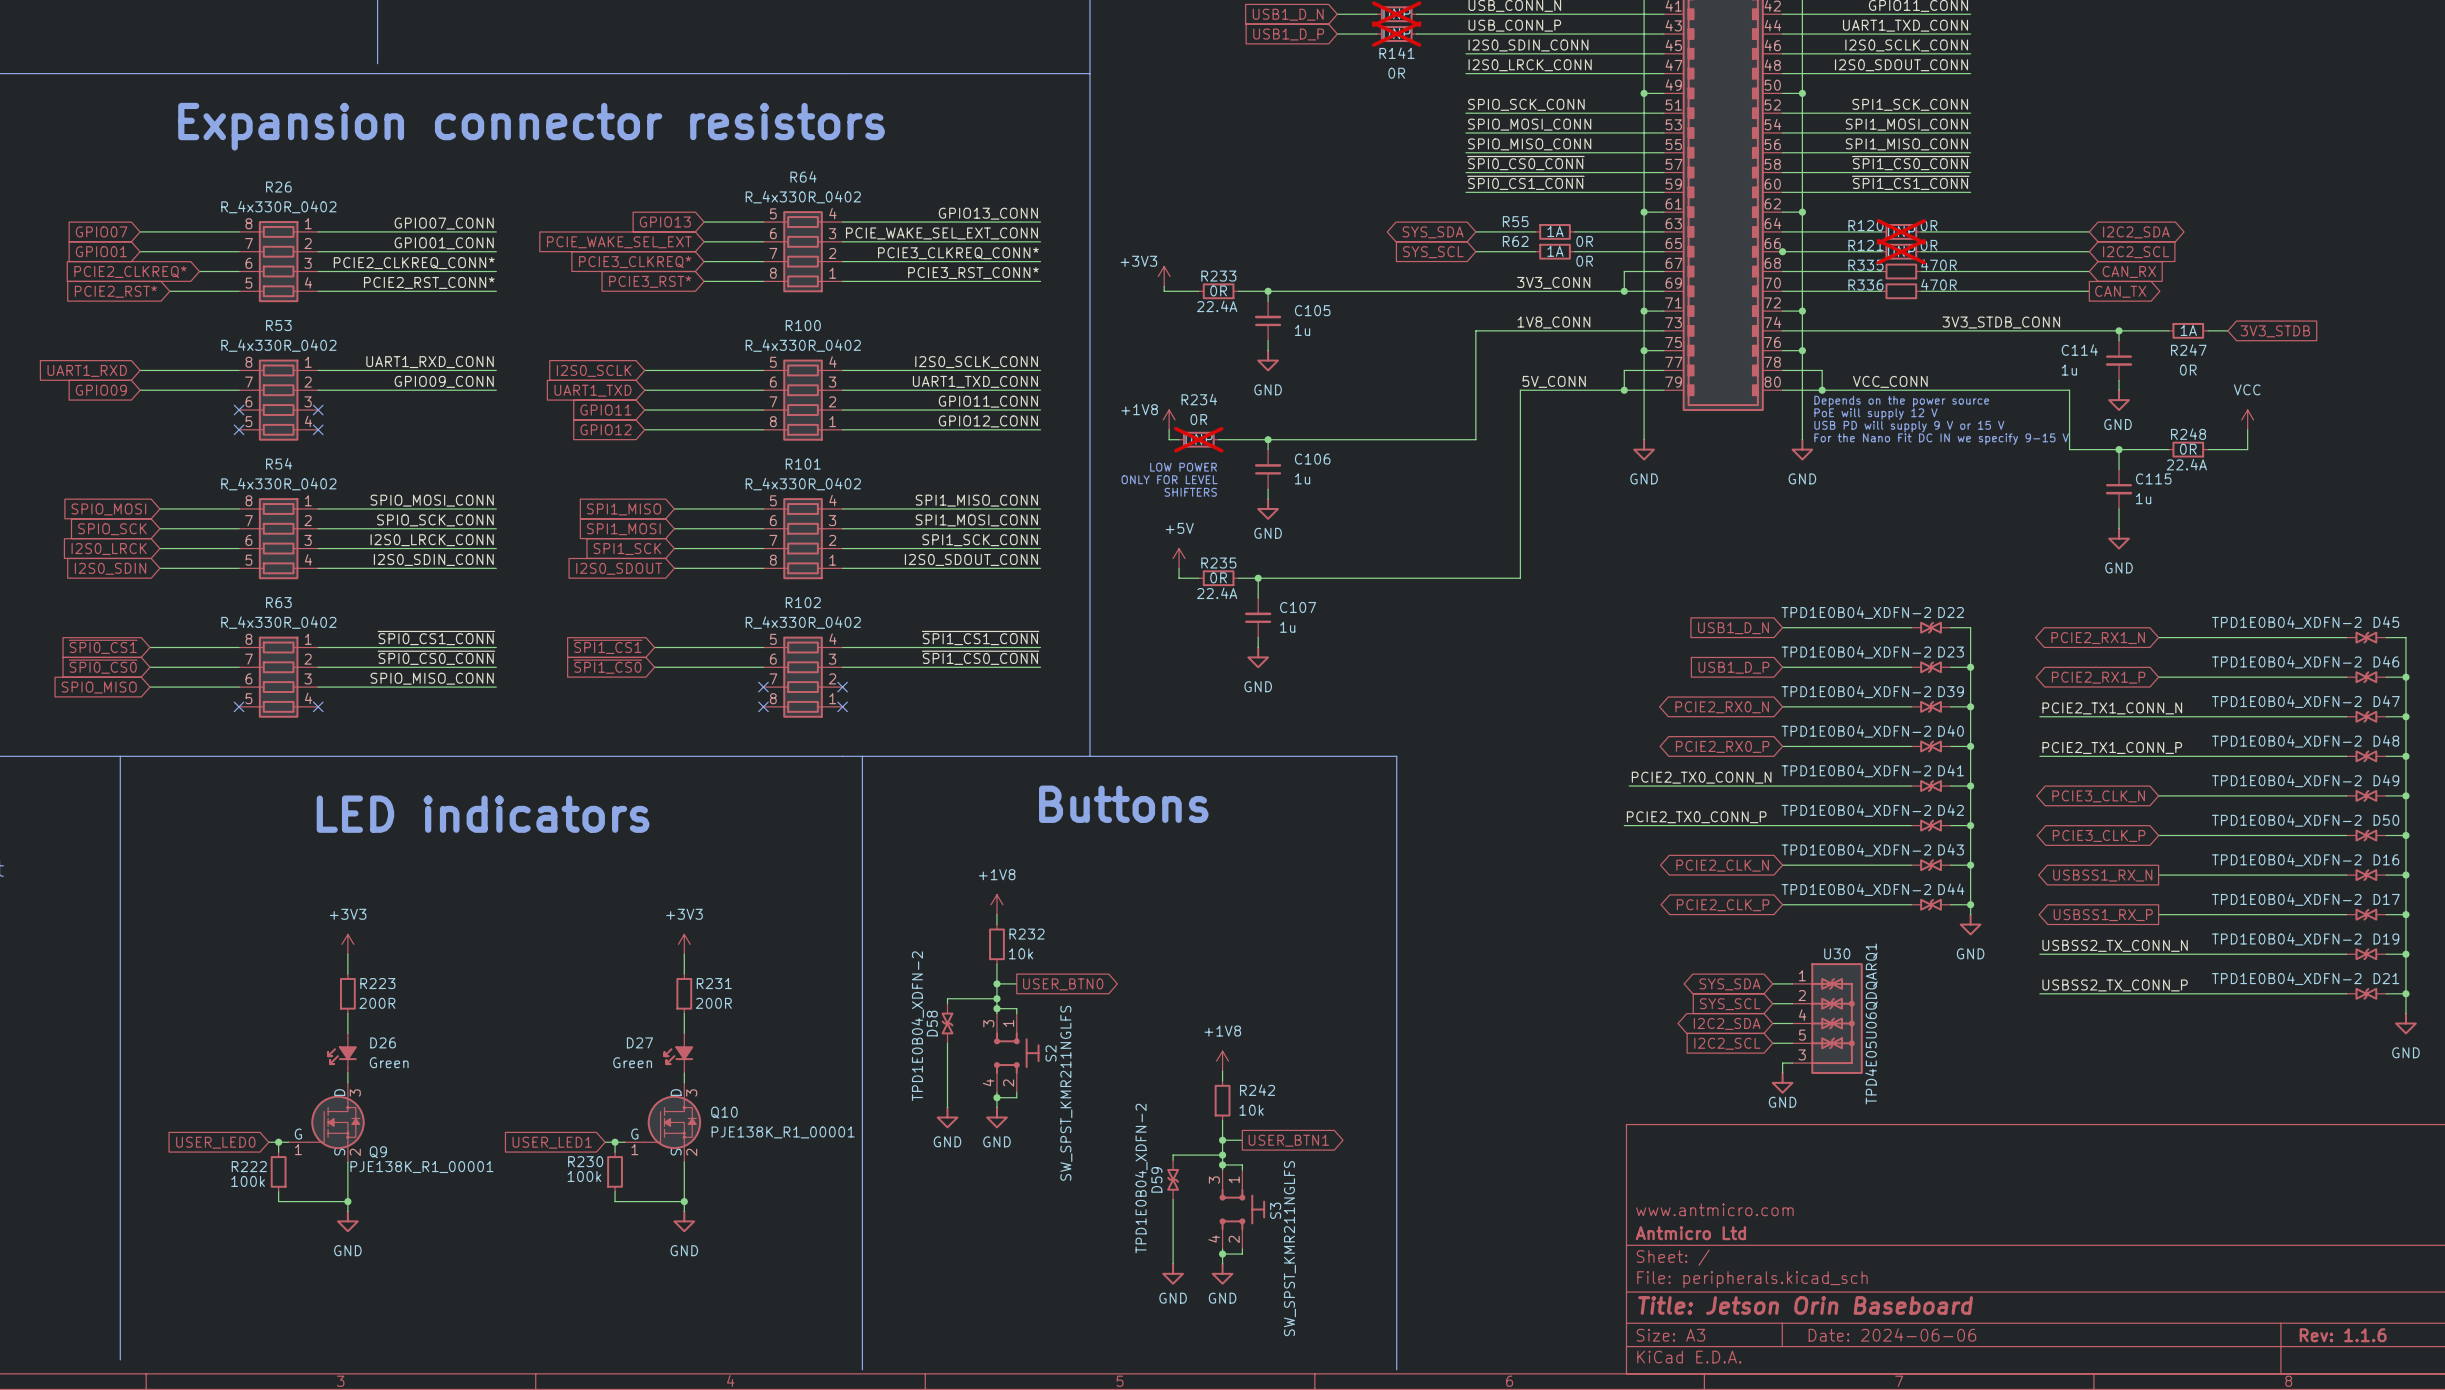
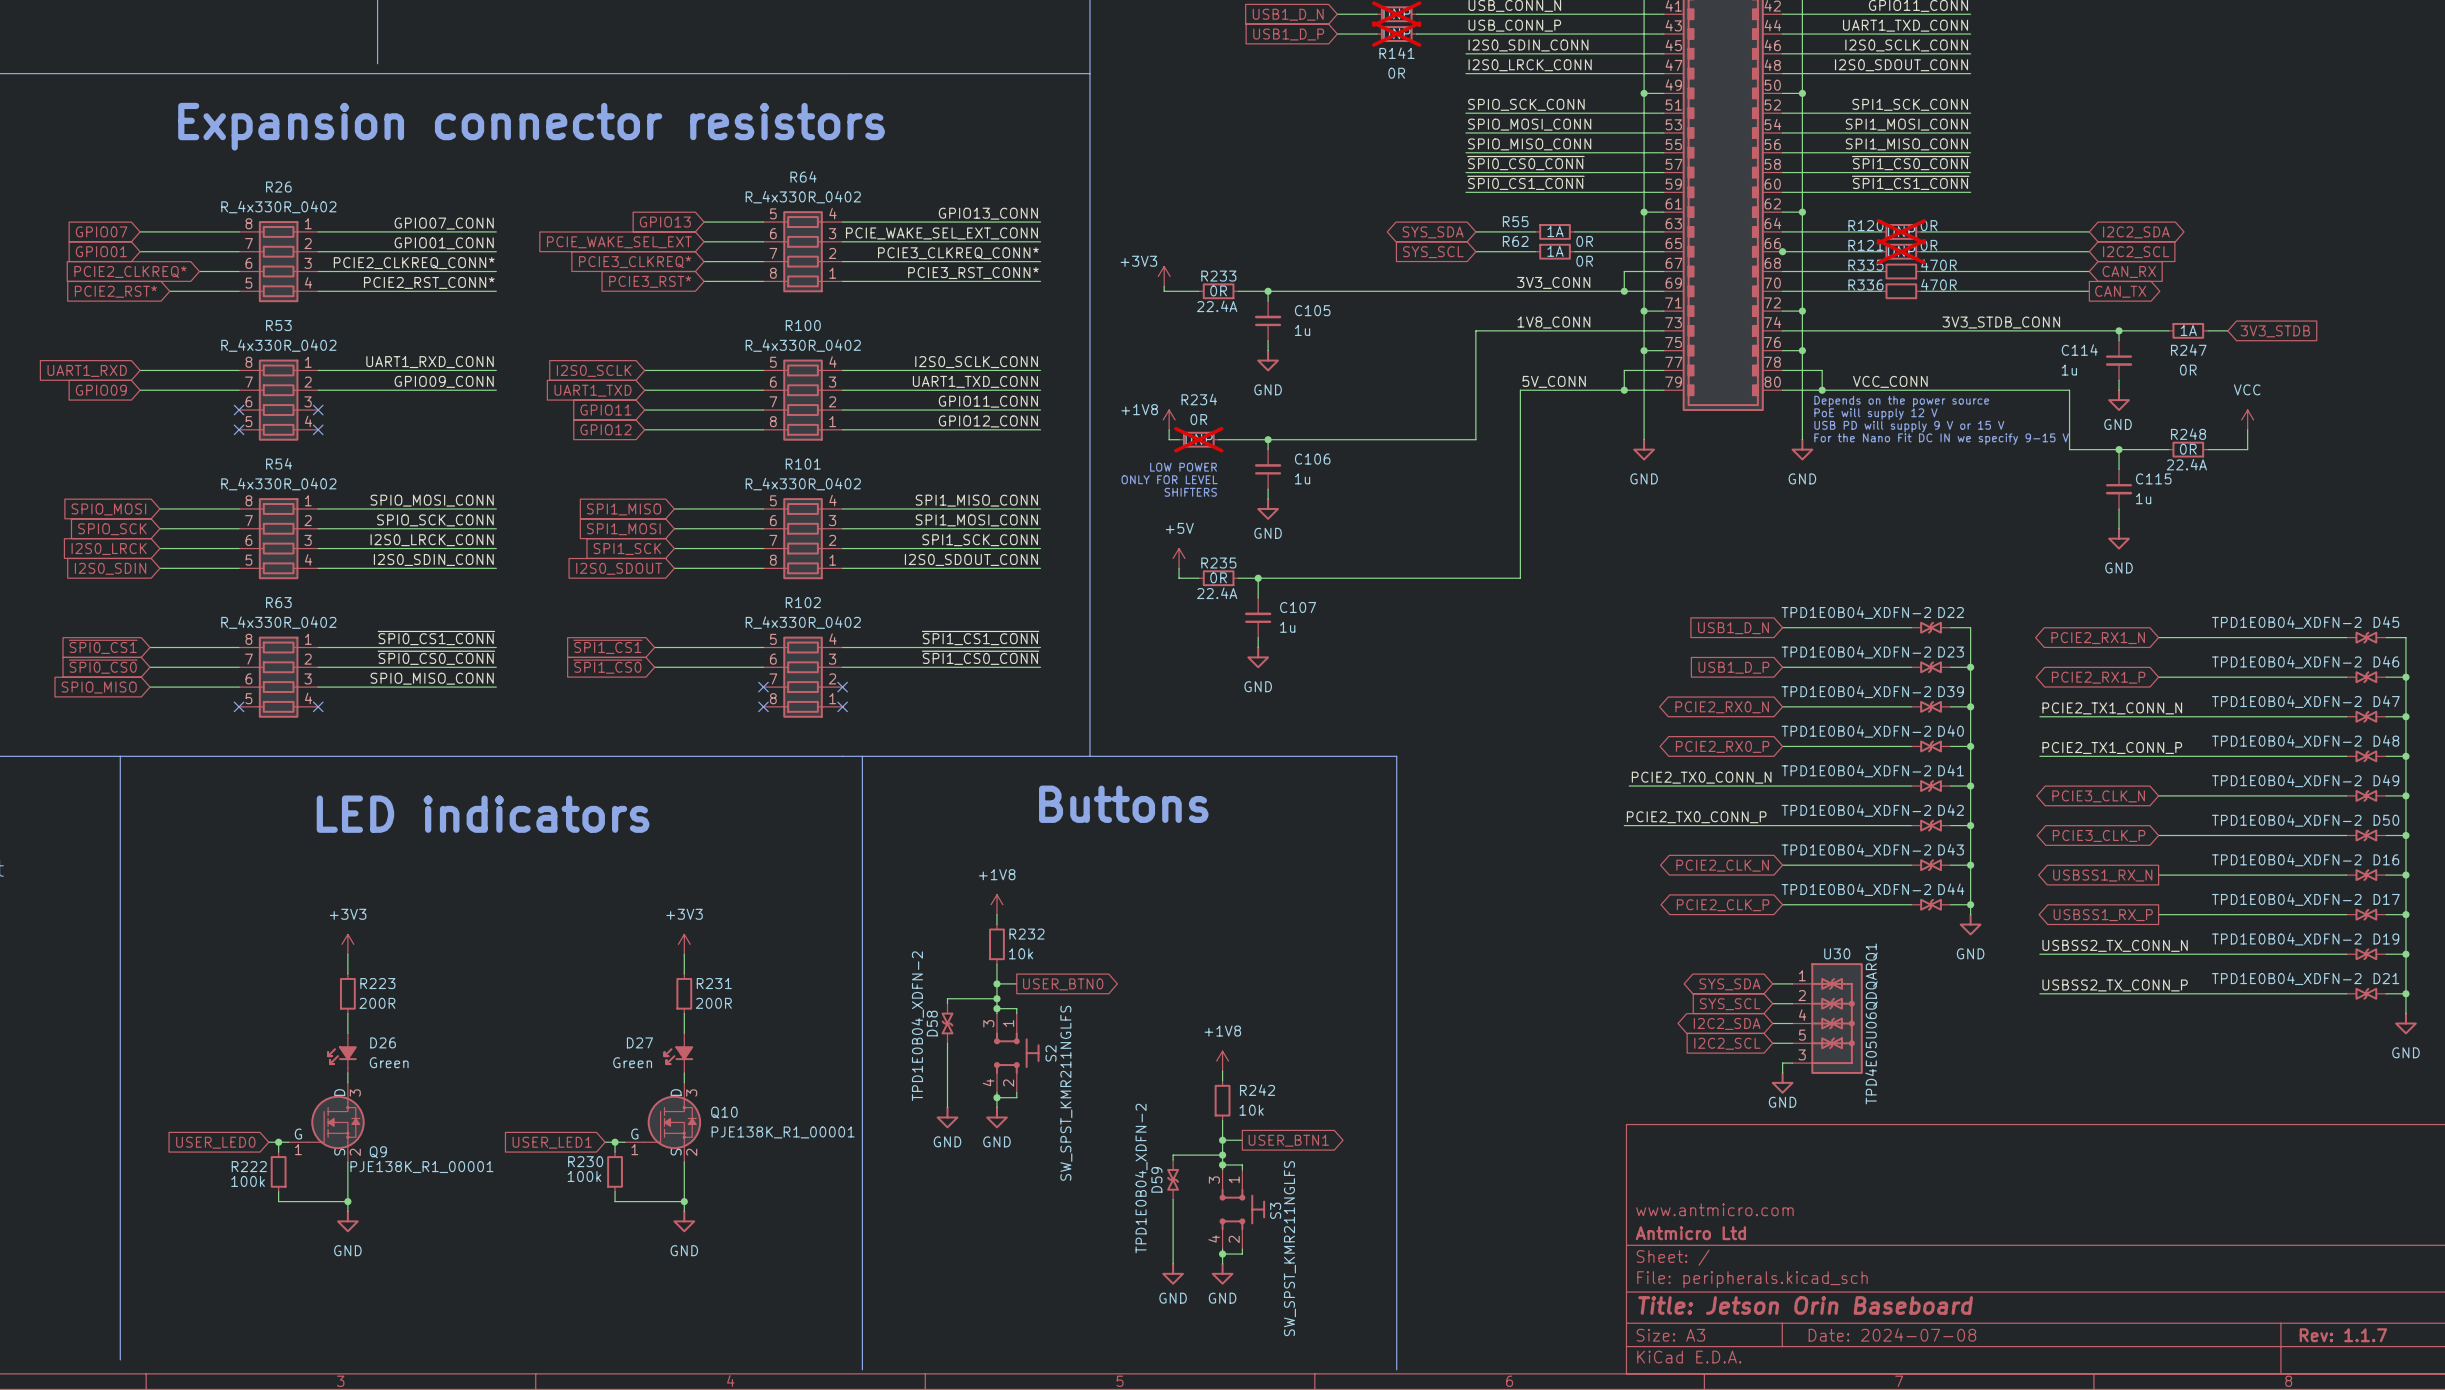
title block: Date: 2024-06-06 (1892, 1334) -> Date: 2024-07-08 (1892, 1334)
title block: Rev: 1.1.6 (2343, 1335) -> Rev: 1.1.7 (2343, 1335)

